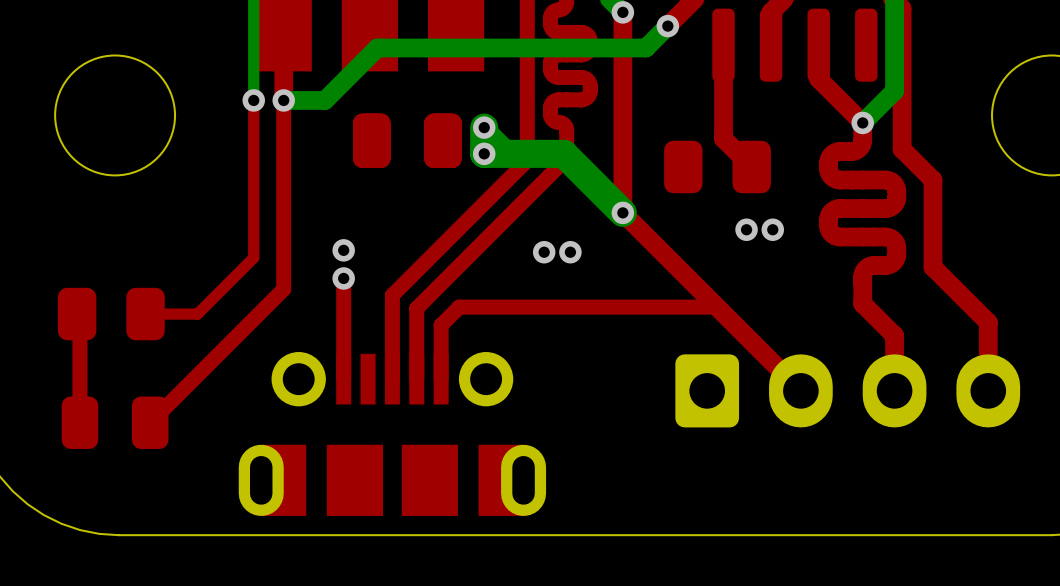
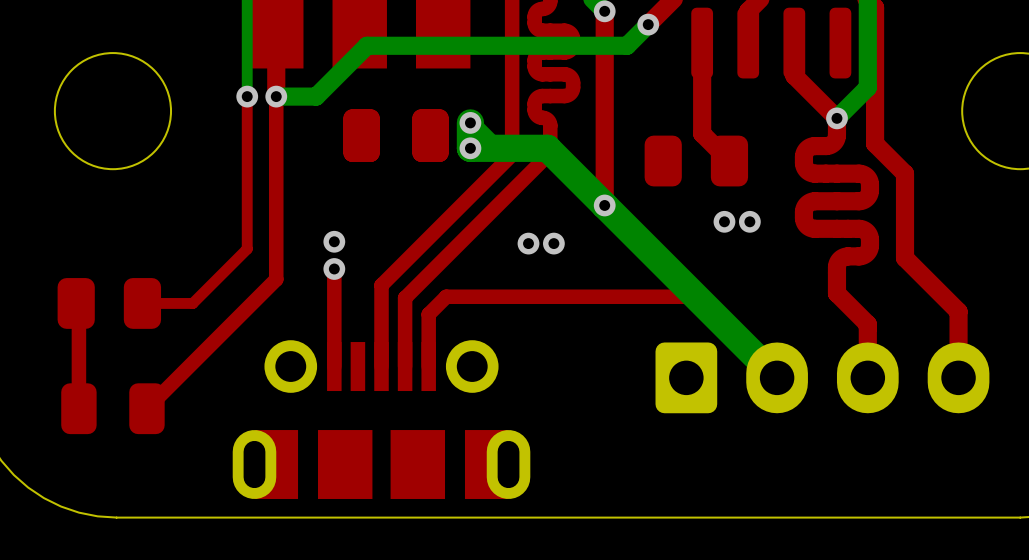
top track: (622, 212) (800, 390) -> none
bottom track: none -> (604, 205) (777, 377)

